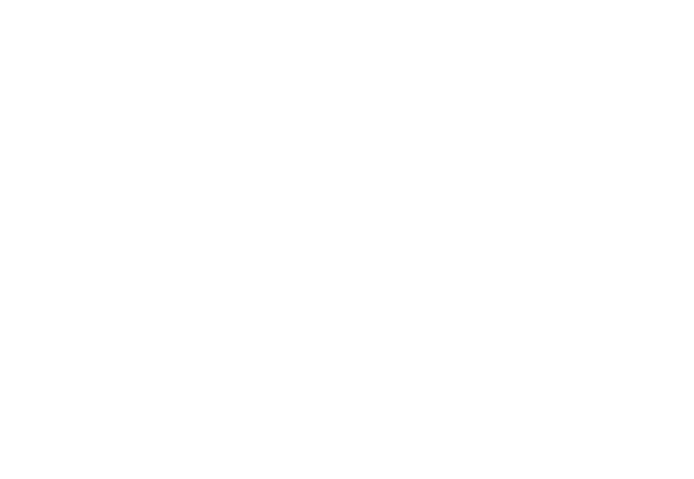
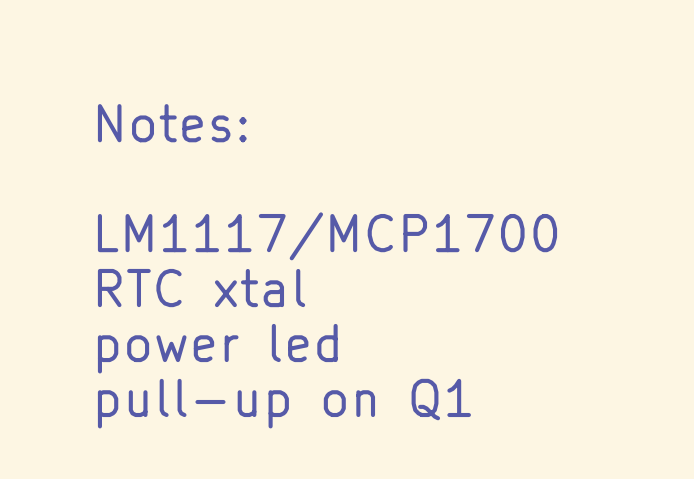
text: none -> Notes: (172, 123)
text: none -> LM1117/MCP1700 (327, 236)
text: none -> RTC xtal (201, 288)
text: none -> power led (217, 348)
text: none -> pull-up on Q1 (284, 403)

